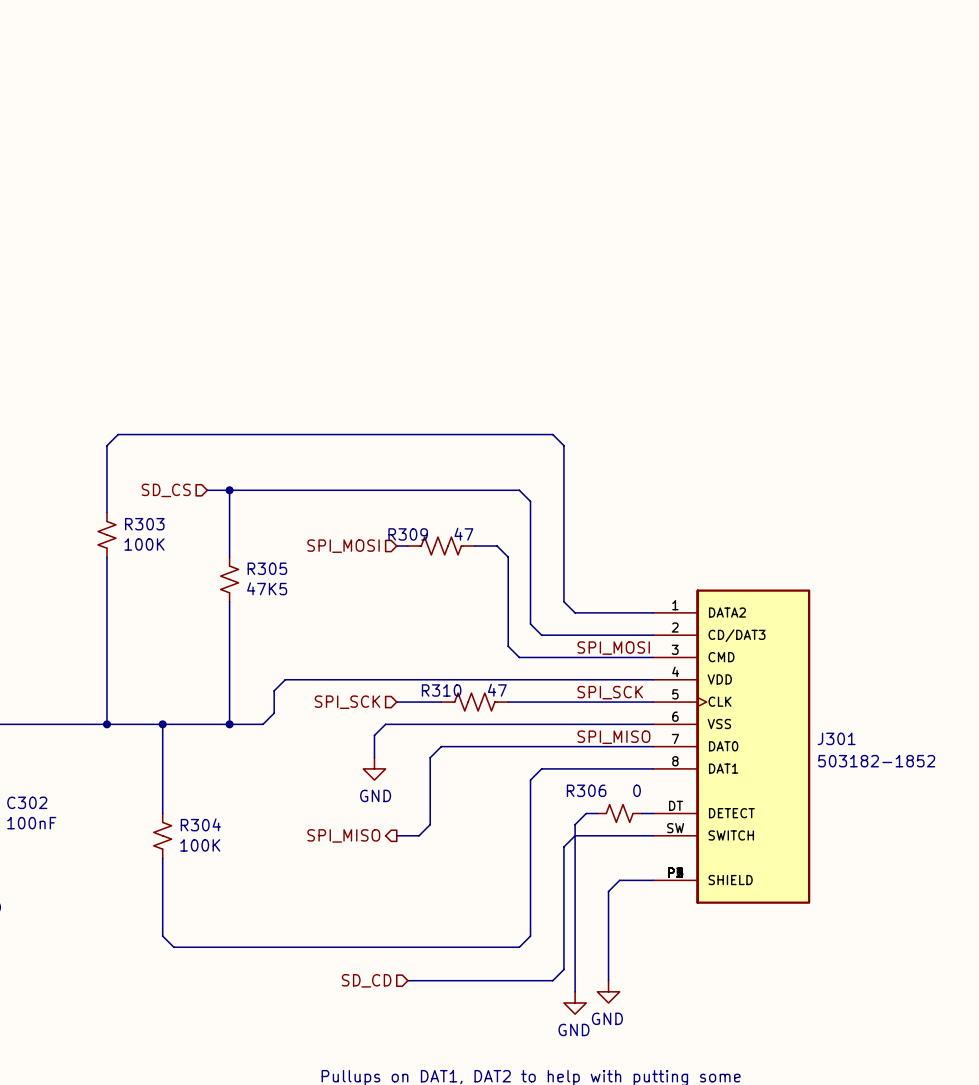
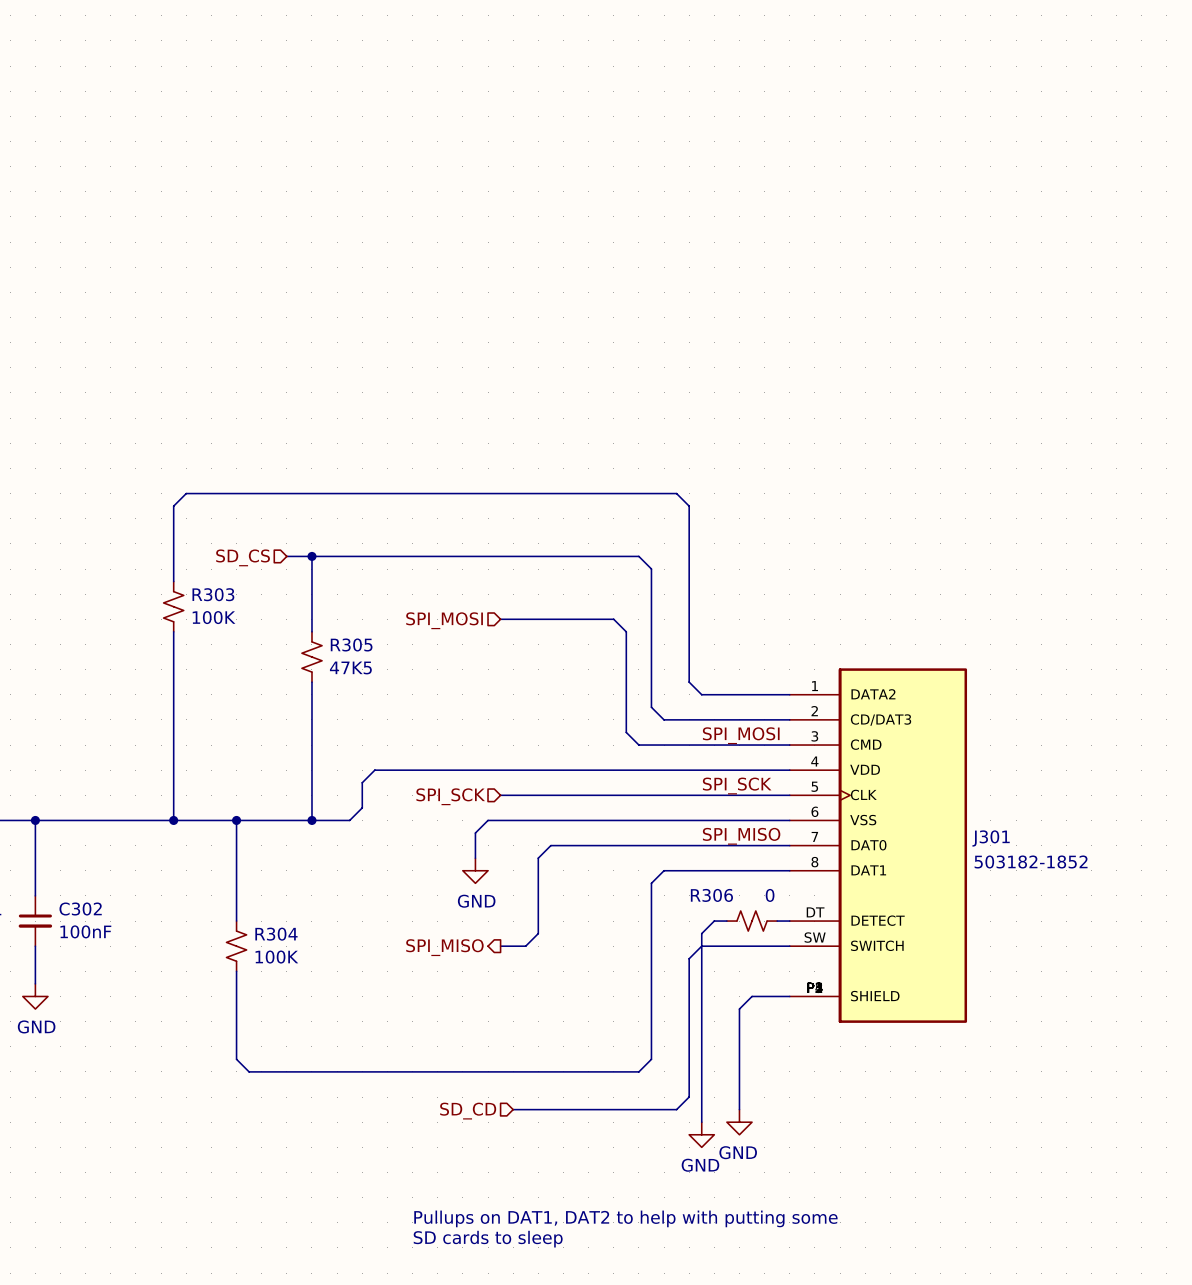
R309: 47 (441, 546) -> none
R310: 47 (474, 702) -> none

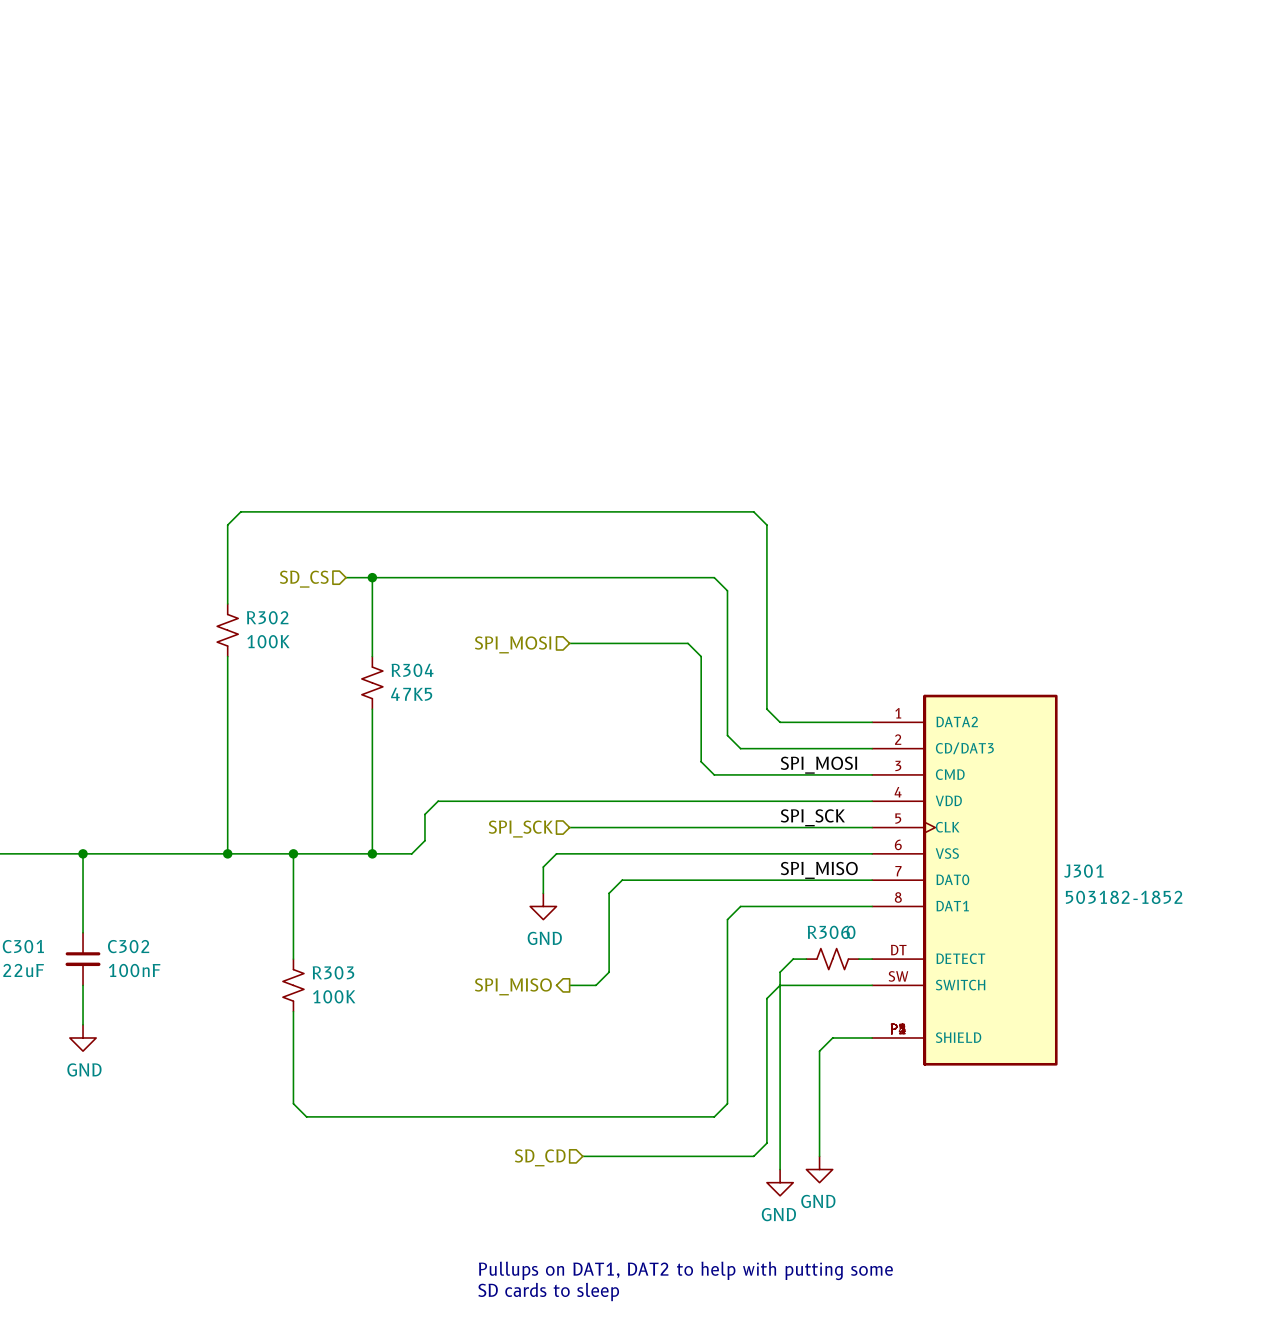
R303 name: R303 (213, 594) -> R302 (267, 617)
R305 name: R305 (351, 644) -> R304 (412, 670)
R306 name position: R306 (711, 895) -> R306 (828, 932)
R304 name: R304 (276, 934) -> R303 (333, 972)

